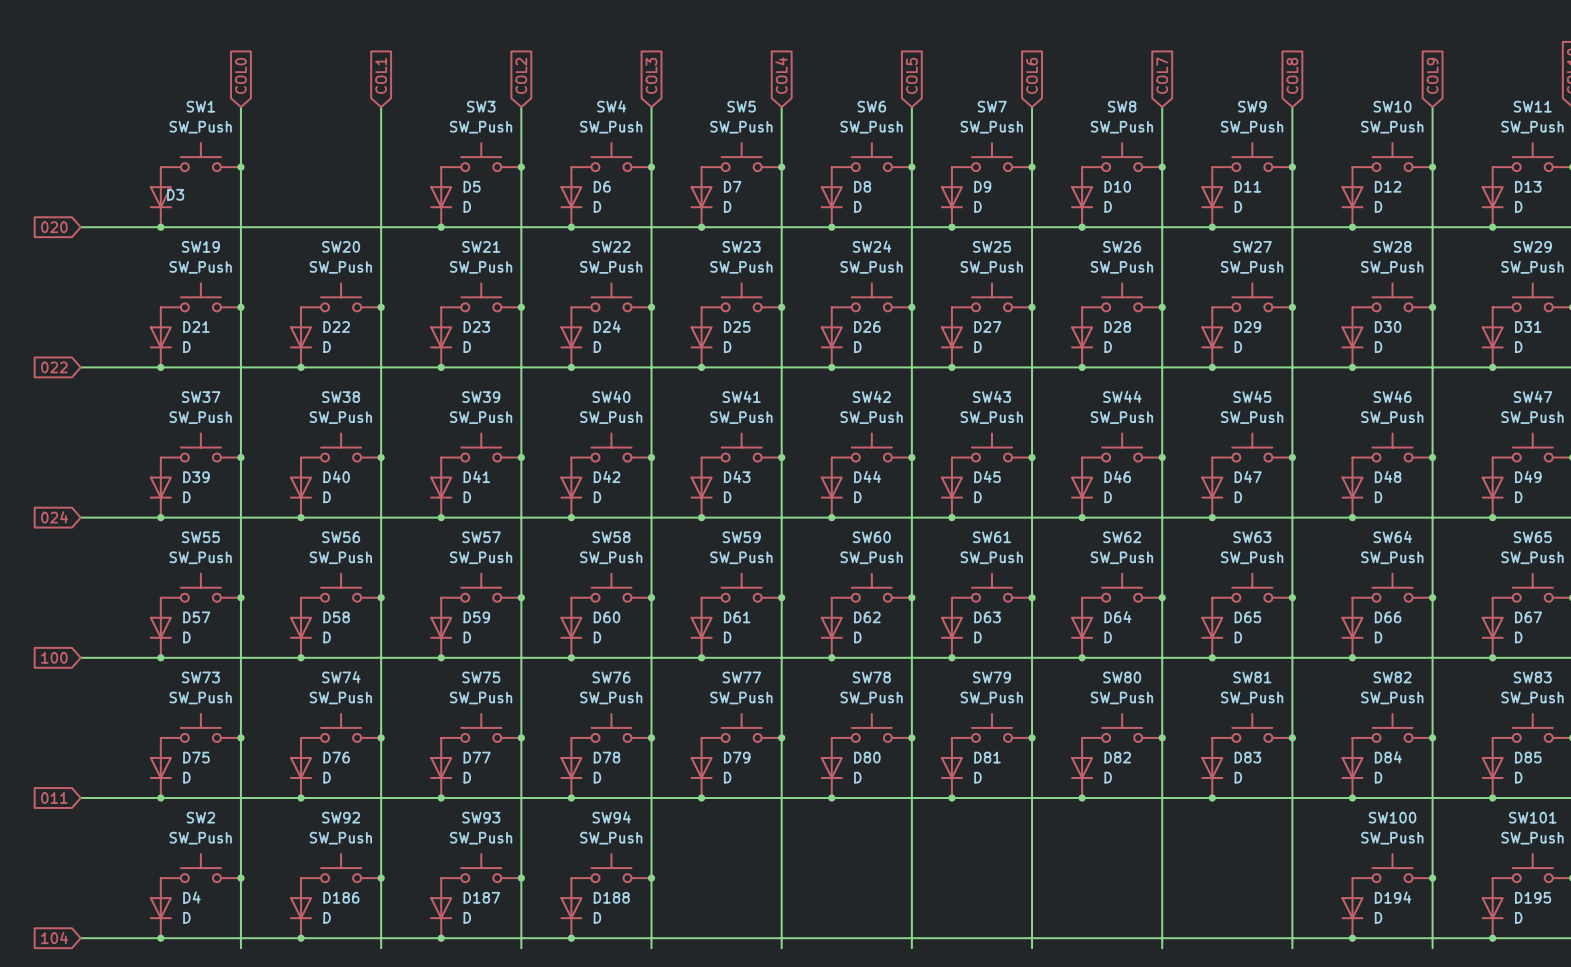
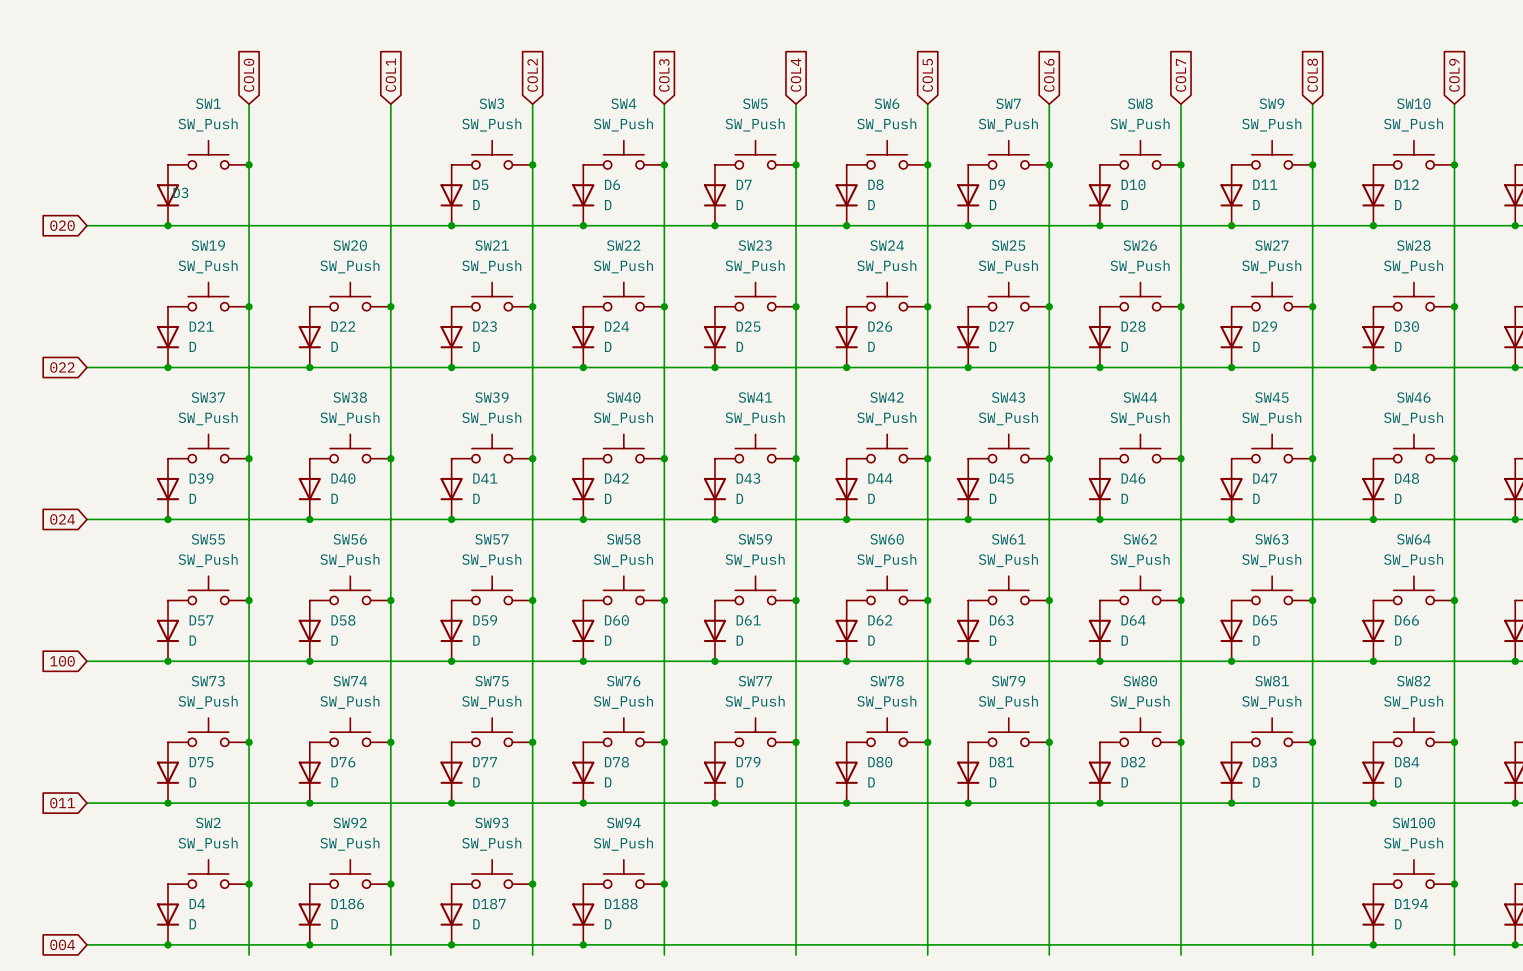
global label: 104 (54, 937) -> 004 (62, 944)

